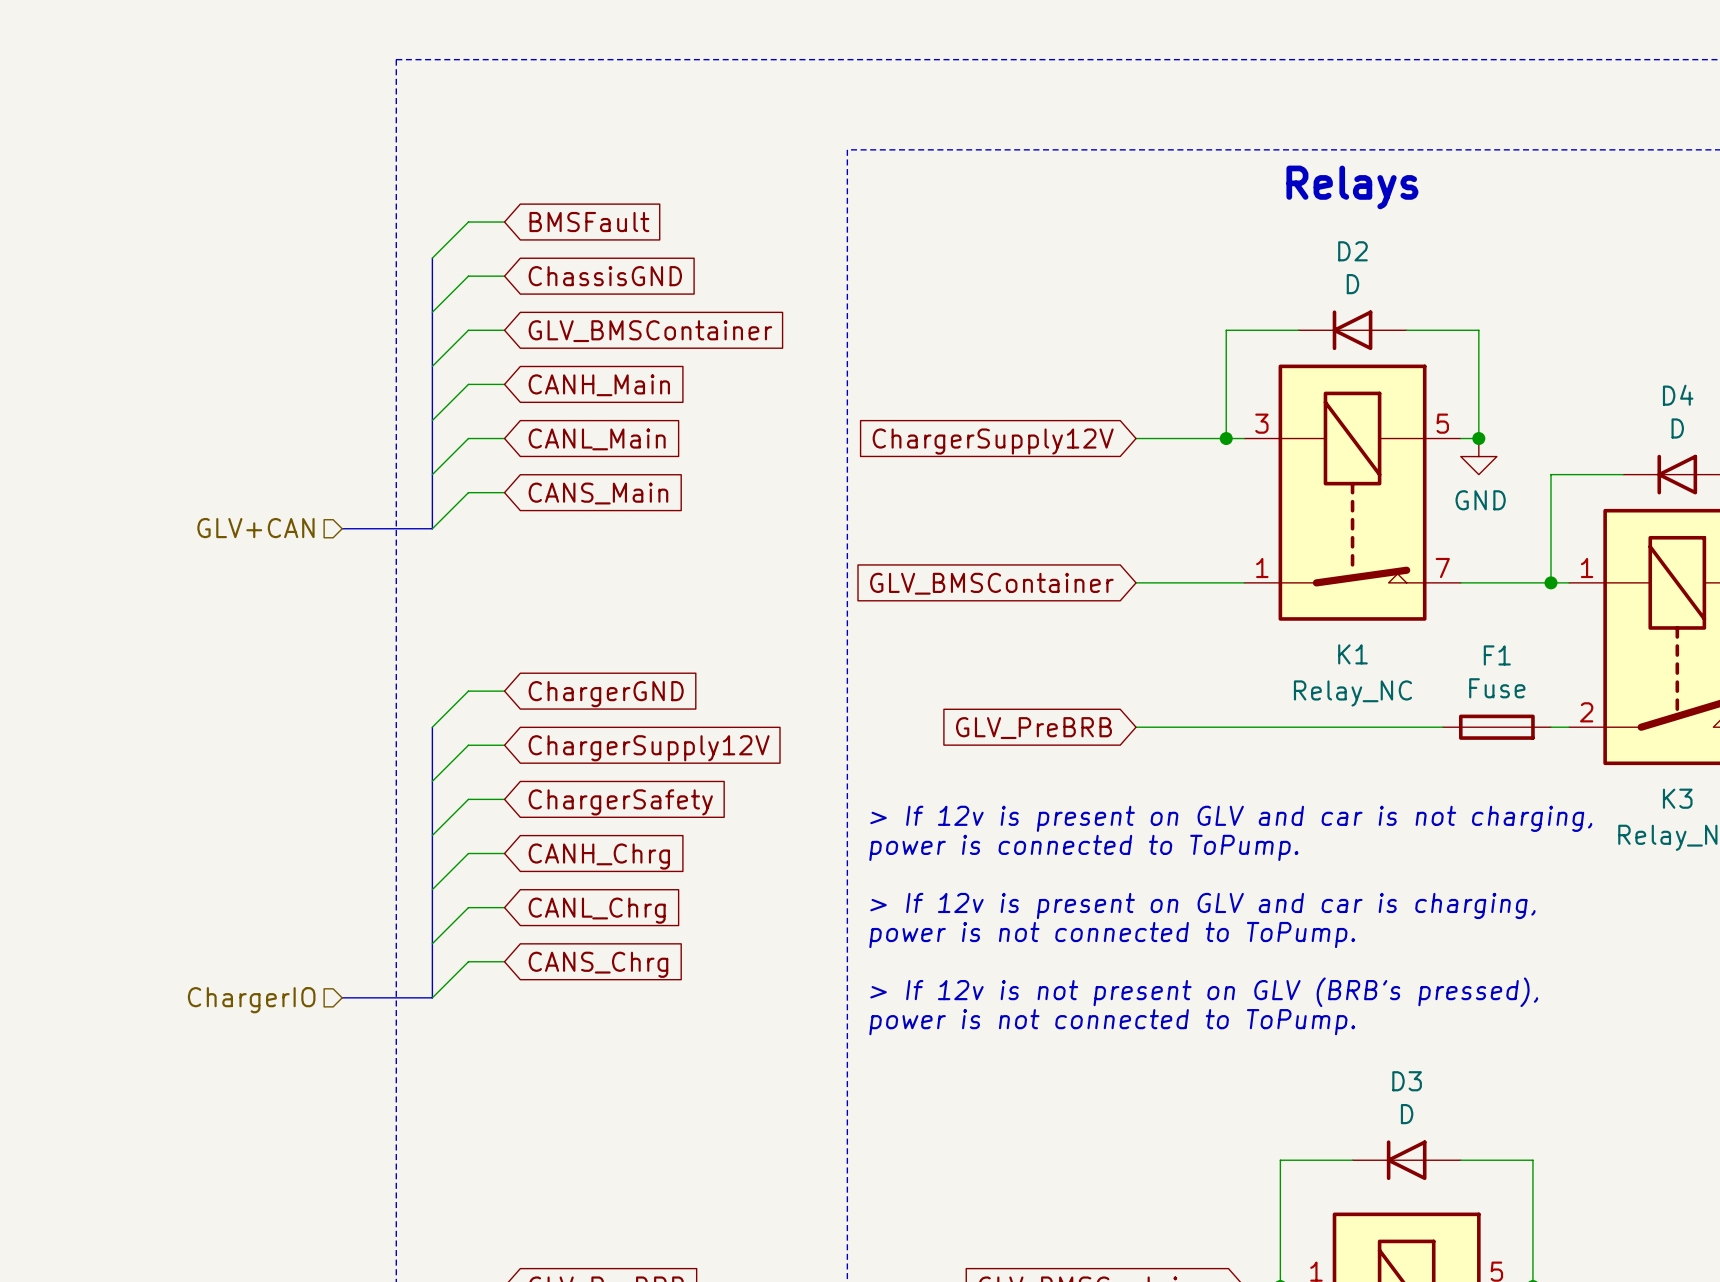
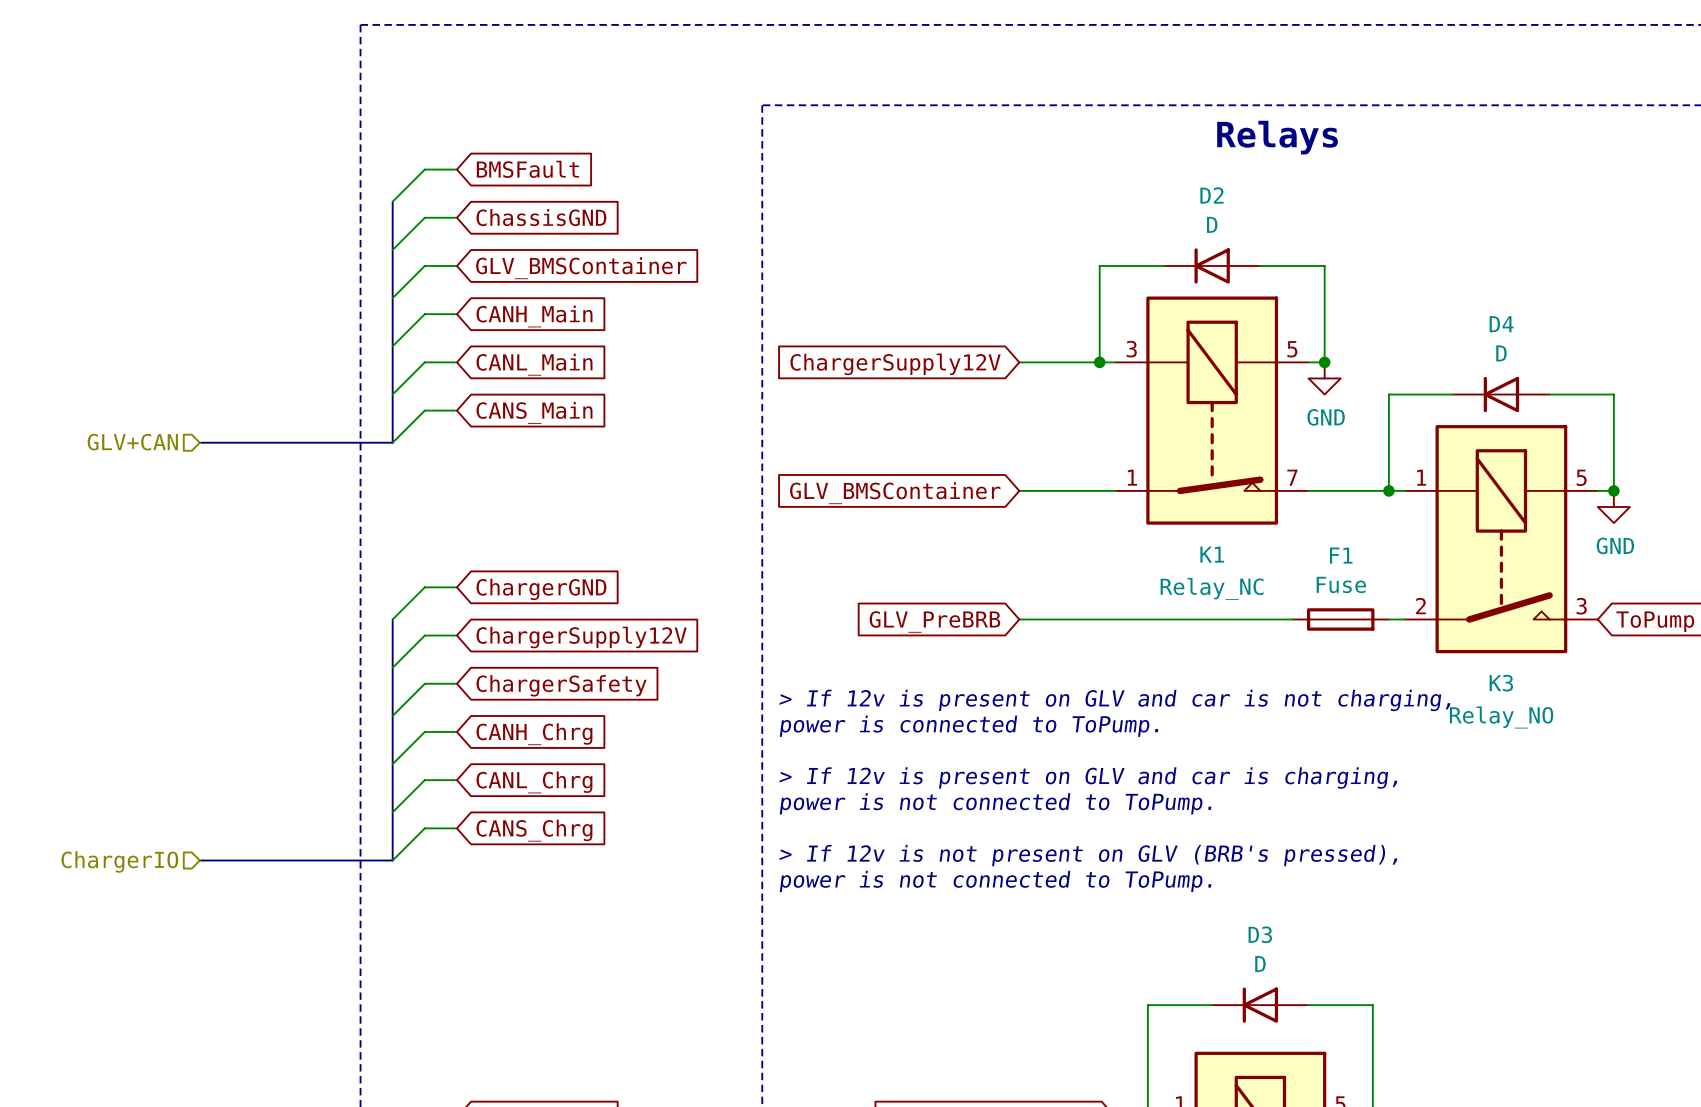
text position: Relays (1352, 187) -> Relays (1277, 137)
bus: none -> (199, 442) (312, 442)
hierarchical label position: GLV+CAN (255, 528) -> GLV+CAN (132, 442)
bus: none -> (199, 860) (312, 860)
hierarchical label position: ChargerIO (251, 1000) -> ChargerIO (119, 861)

